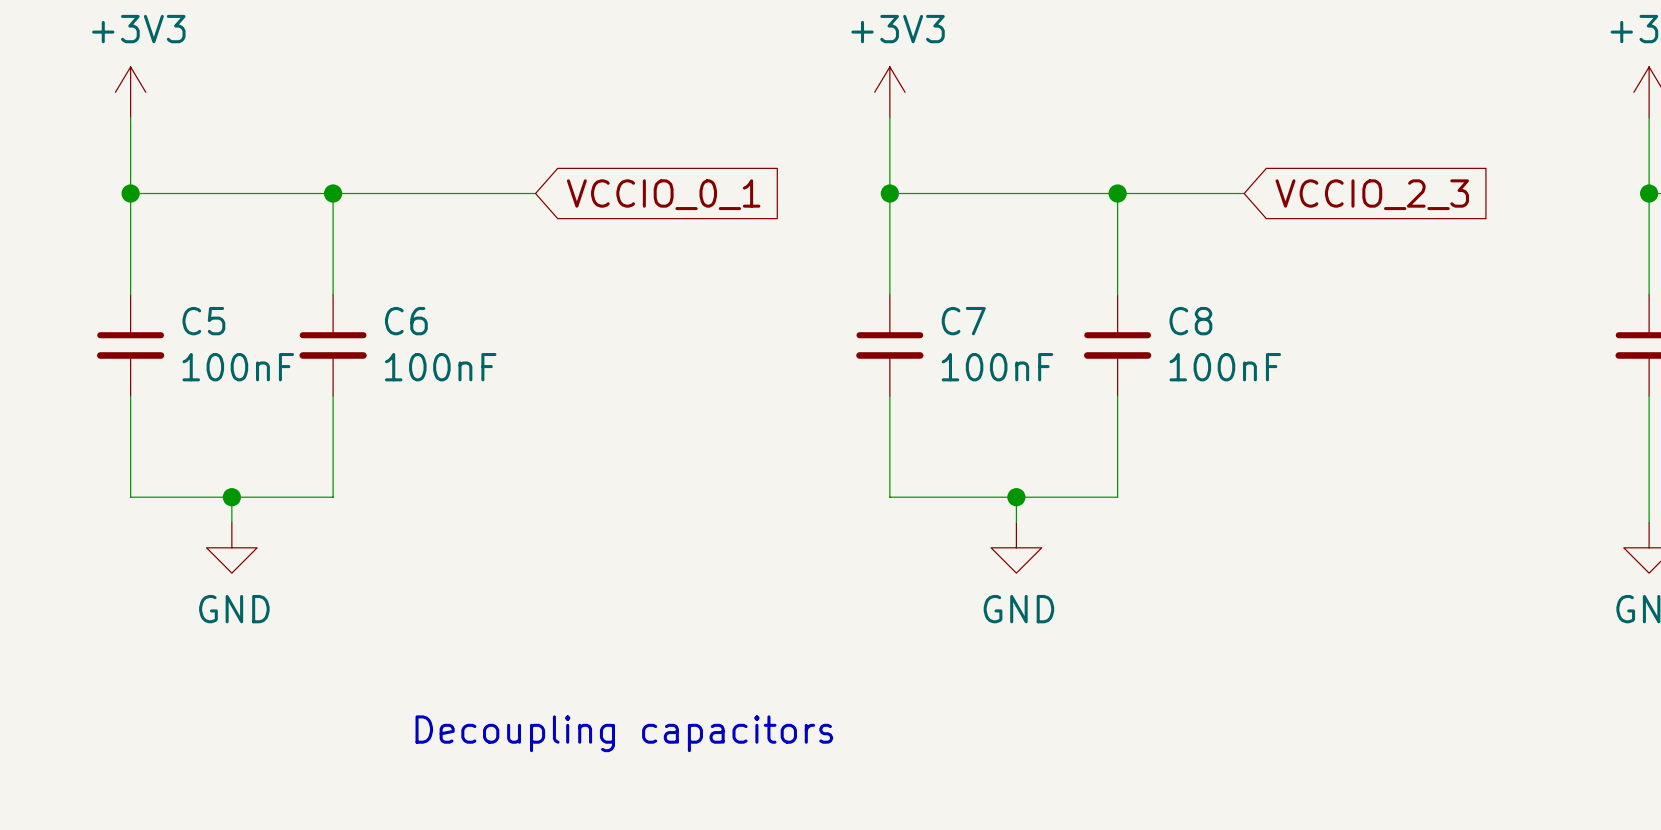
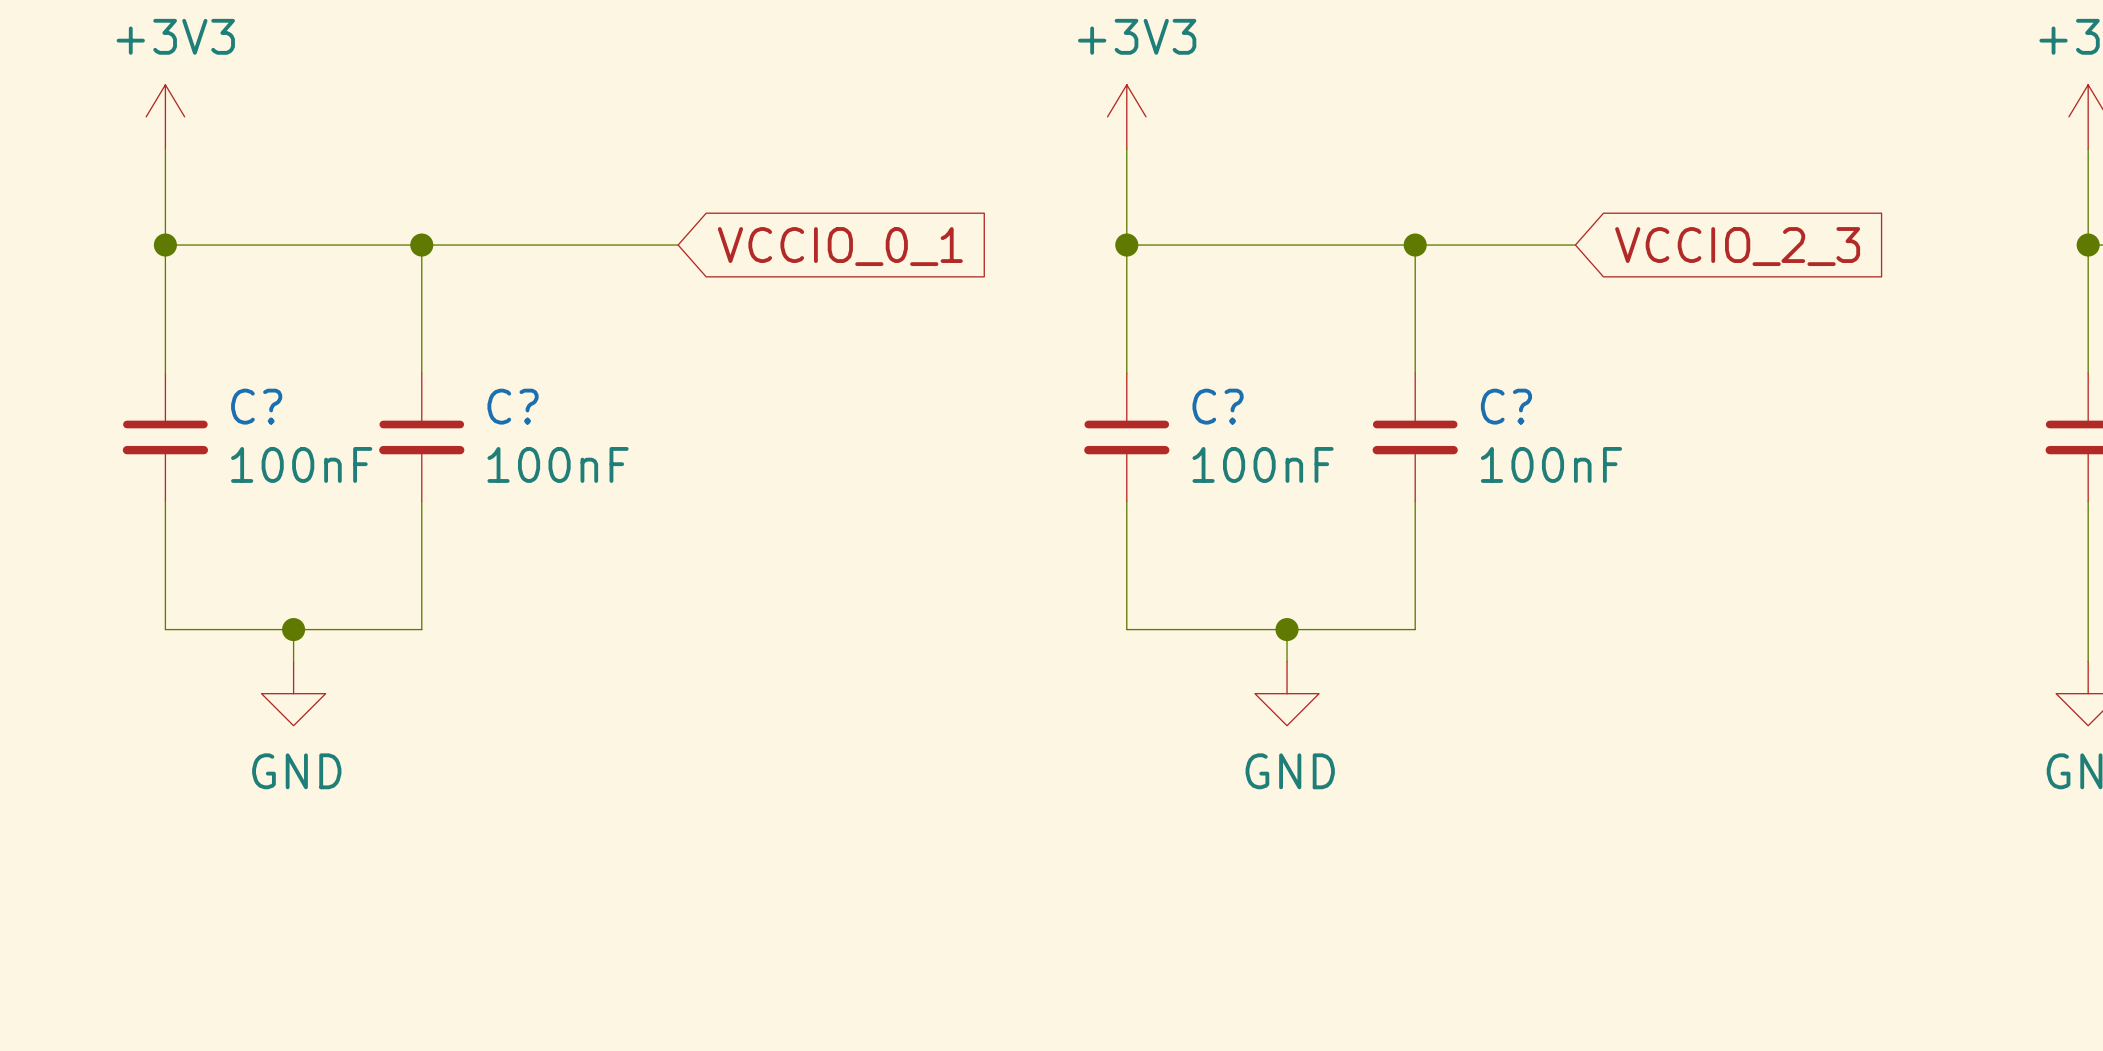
C5 name: C5 (203, 321) -> C? (256, 406)
C6 name: C6 (406, 321) -> C? (513, 406)
C7 name: C7 (963, 321) -> C? (1218, 406)
C8 name: C8 (1190, 321) -> C? (1506, 406)
text: Decoupling capacitors (624, 733) -> none

